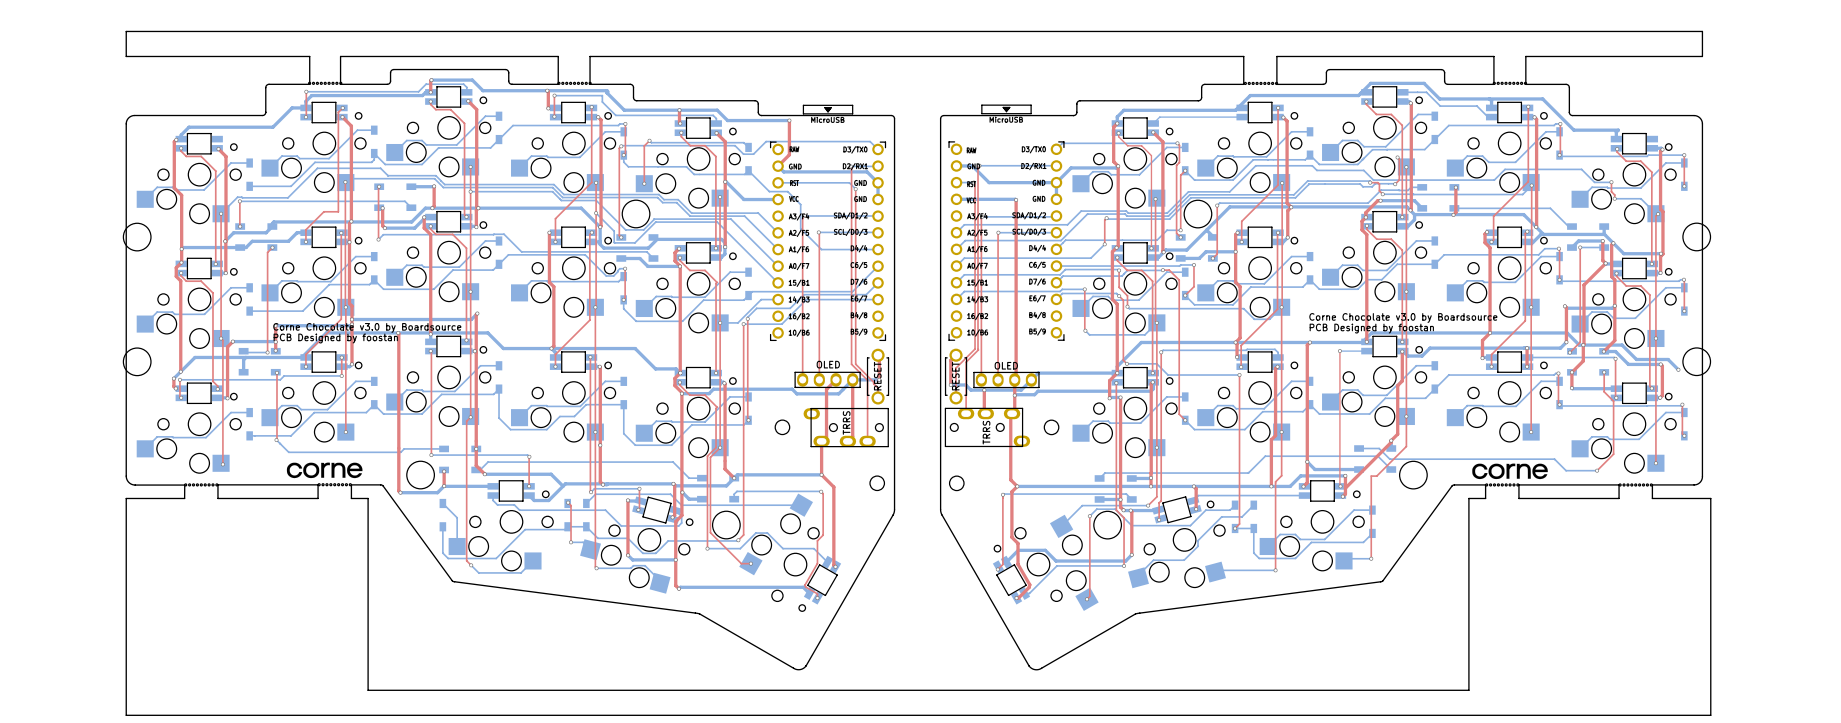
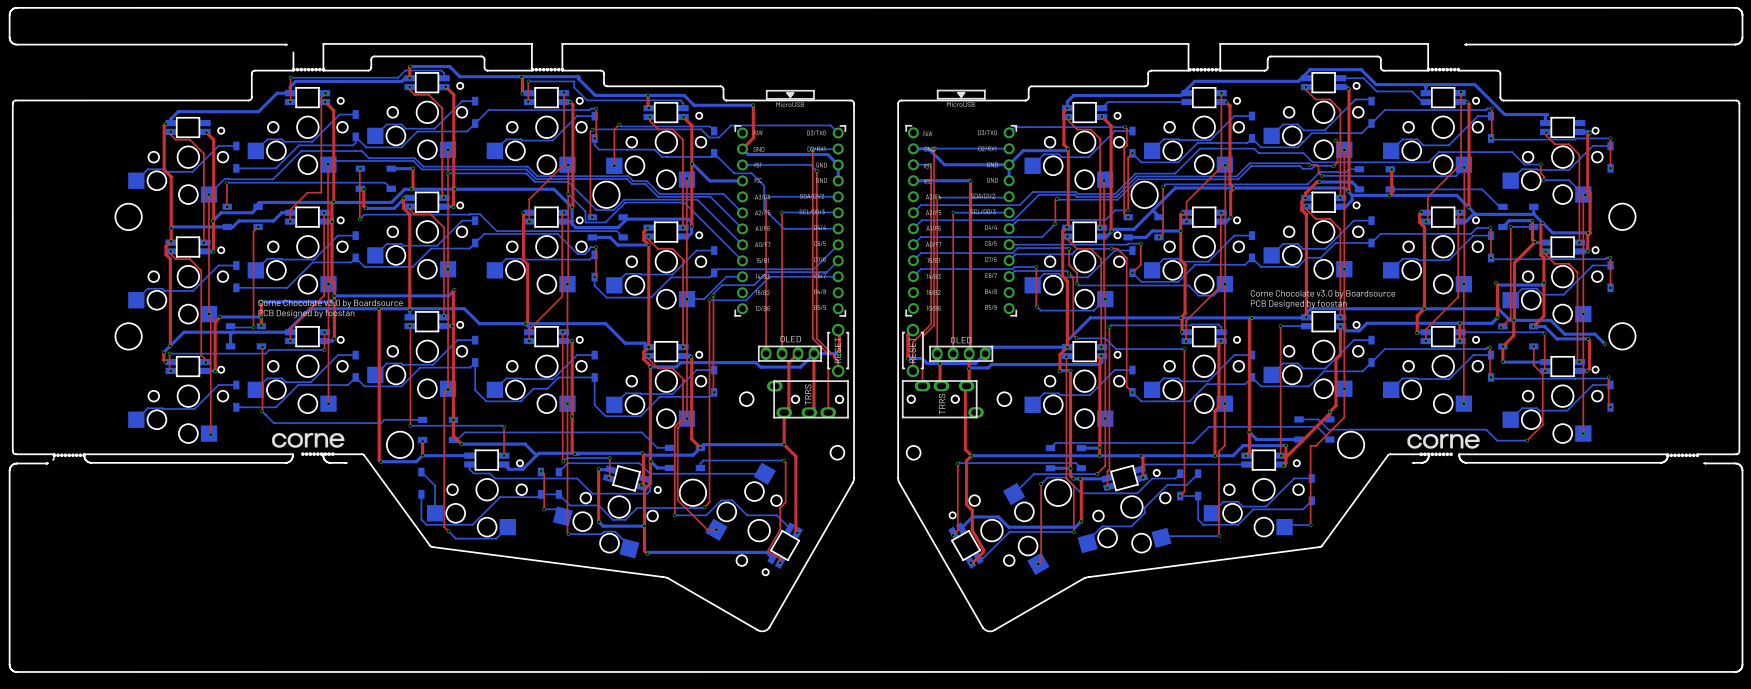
board edge: none -> (1742, 14) (1740, 9) (1735, 7) (16, 7) (12, 9) (9, 13) (9, 38) (15, 44) (287, 44)
board edge: none -> (1742, 14) (1742, 38) (1736, 44) (1464, 44)
board edge: (309, 84) (309, 56) (126, 56) (126, 31) (1702, 31) (1702, 56) (1525, 56) (1525, 84) -> (293, 70) (293, 52)
board edge: (134, 115) (128, 117) (126, 123) (126, 477) (128, 482) (134, 484) (184, 485) (184, 498) (126, 498) (126, 715) (1710, 715) (1710, 498) (1652, 498) (1652, 484) -> (1547, 454) (1579, 454)
board edge: none -> (126, 100) (15, 100) (12, 103)
board edge: (1572, 115) (1694, 115) (1699, 117) (1702, 121) (1702, 476) (1699, 482) (1694, 484) -> (1503, 100) (1736, 100) (1739, 103)
board edge: none -> (12, 103) (12, 451) (15, 454)
board edge: none -> (1739, 103) (1739, 451)
board edge: none -> (1739, 451) (1736, 454)
board edge: none -> (15, 454) (54, 454) (54, 457)
part position: (201, 484) -> (69, 455)
board edge: (217, 484) (217, 498) (318, 498) (318, 484) (308, 484) -> (206, 454) (84, 455) (86, 460) (91, 462) (285, 462) (290, 460) (292, 454)
board edge: (380, 484) (351, 484) (351, 498) (368, 498) (368, 690) (1468, 690) (1468, 498) (1485, 498) (1485, 484) -> (1412, 462) (1426, 460) (1428, 454) (1420, 454)
board edge: none -> (361, 454) (323, 454) (324, 459) (327, 462) (346, 463)
board edge: (1526, 484) (1518, 484) (1518, 498) (1619, 498) (1619, 484) -> (1459, 454) (1461, 460) (1466, 462) (1660, 462) (1665, 460) (1667, 454) (1619, 454)
part position: (1635, 484) -> (1682, 455)
board edge: none -> (1736, 454) (1697, 455)
board edge: none -> (53, 458) (53, 459)
board edge: none -> (1703, 463) (1736, 463) (1742, 469) (1742, 664) (1741, 668) (1736, 671) (15, 671) (10, 668) (9, 664) (9, 469) (15, 463) (48, 463)

